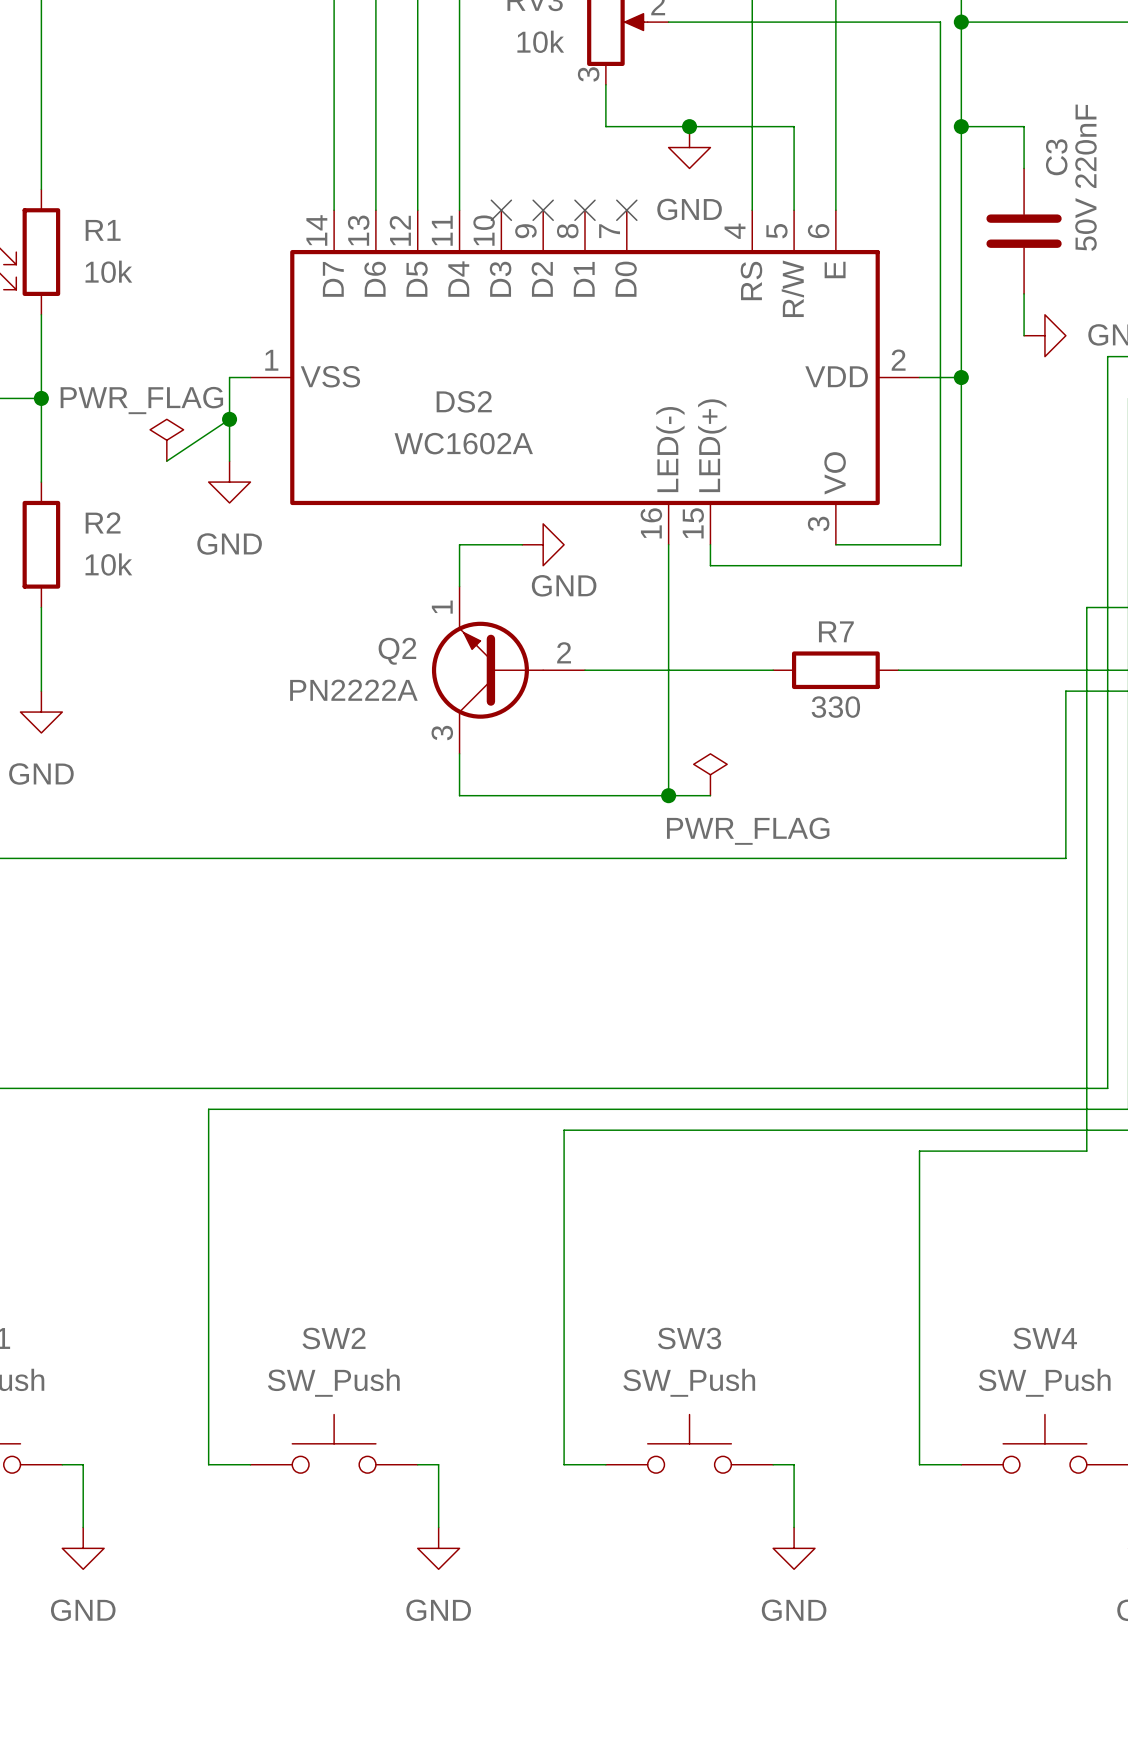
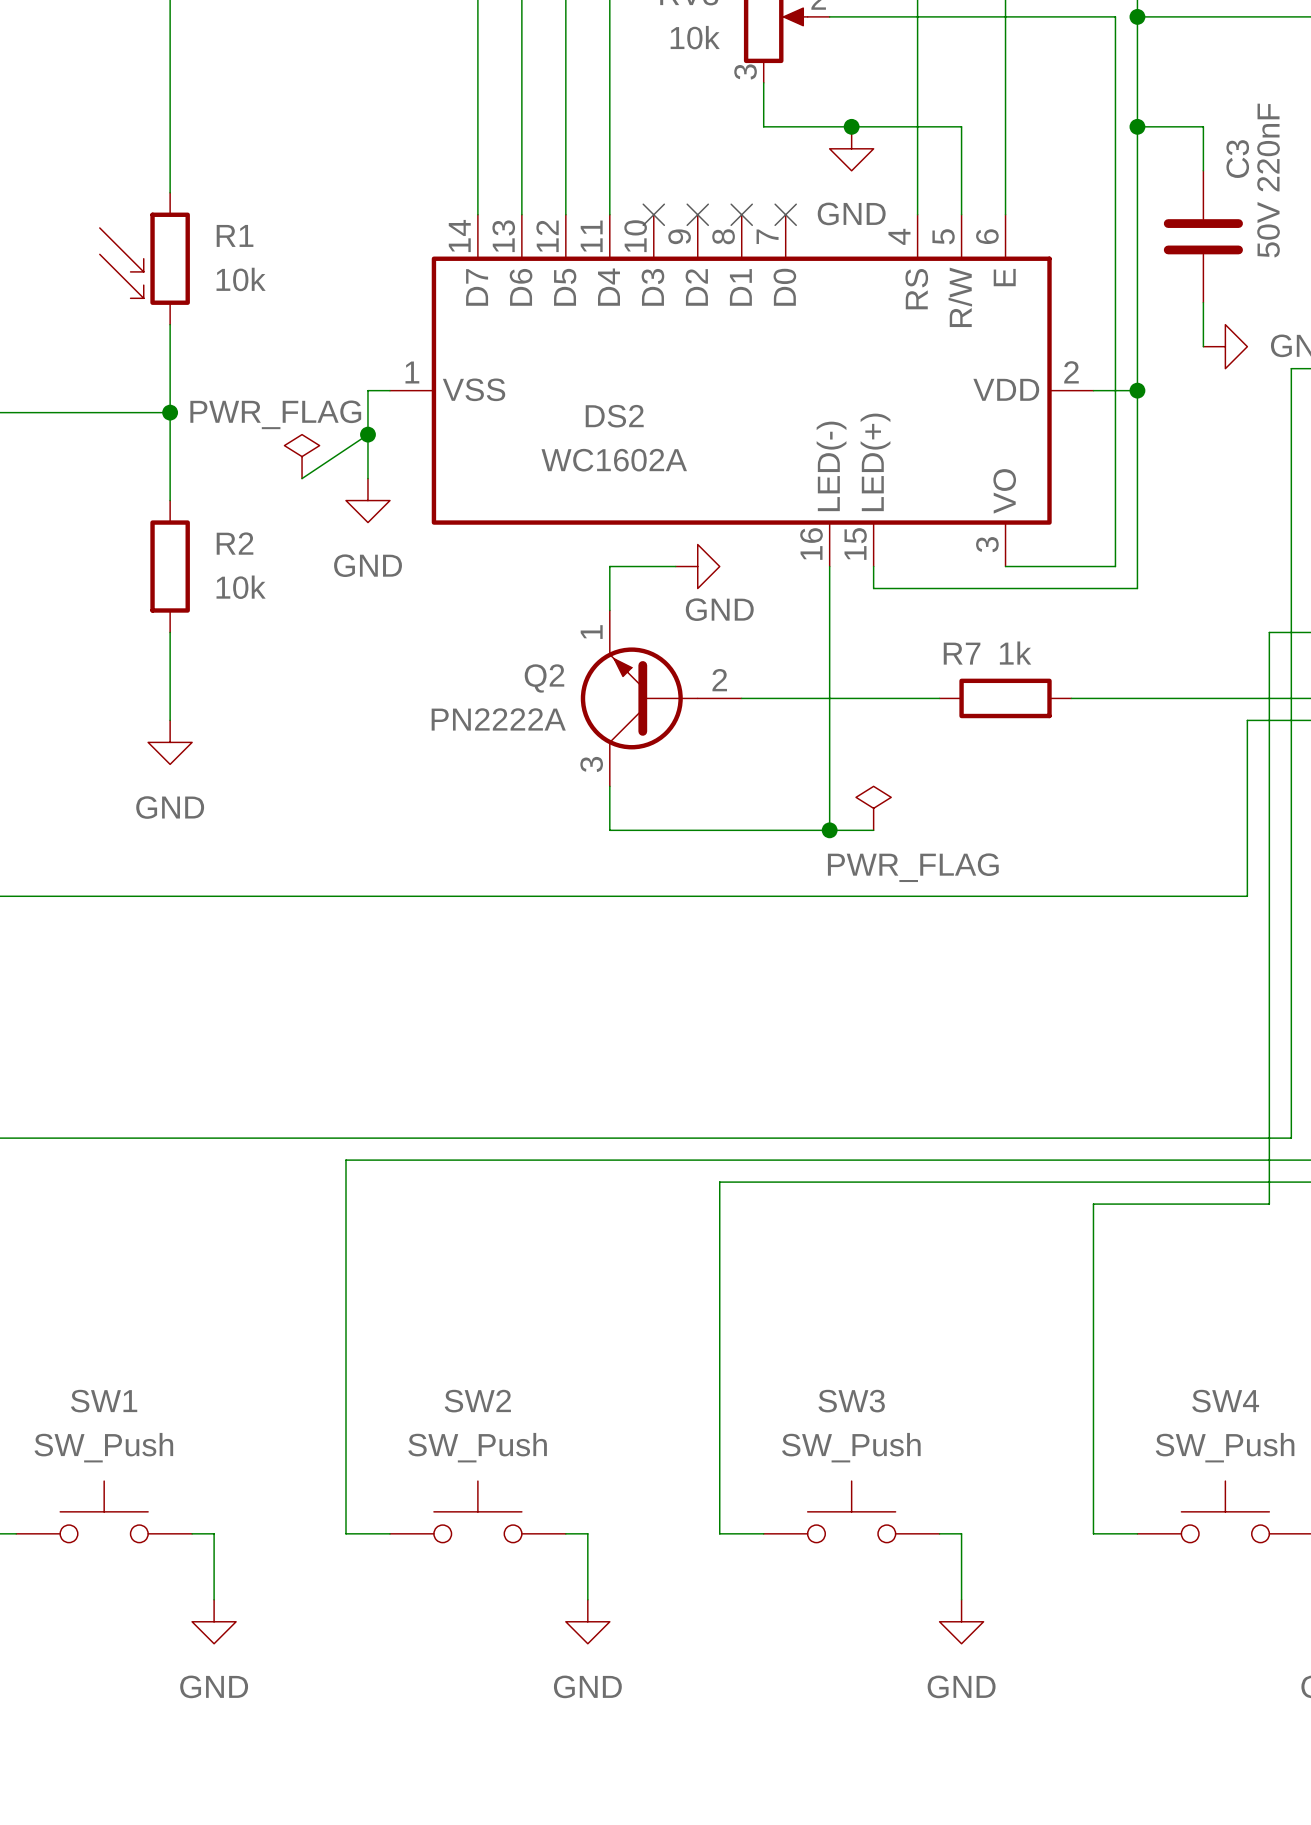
R7 name position: R7 (836, 631) -> R7 (962, 653)
R7 value: 330 (835, 707) -> 1k (1015, 653)

